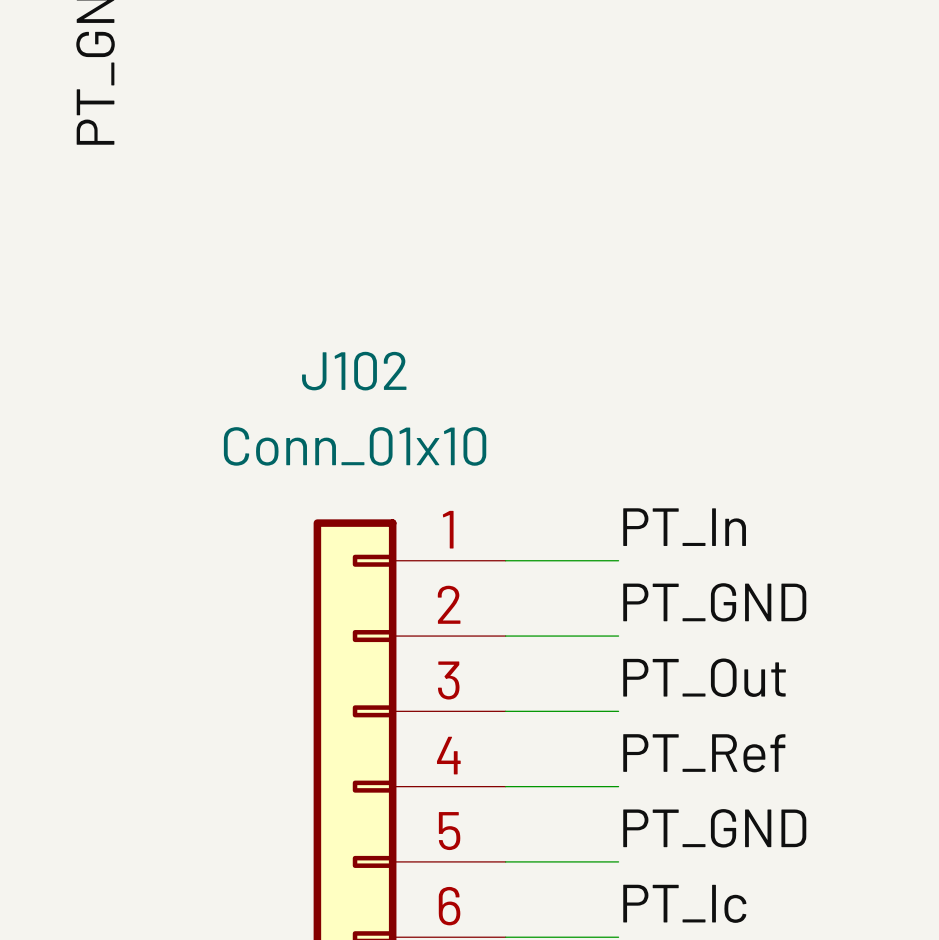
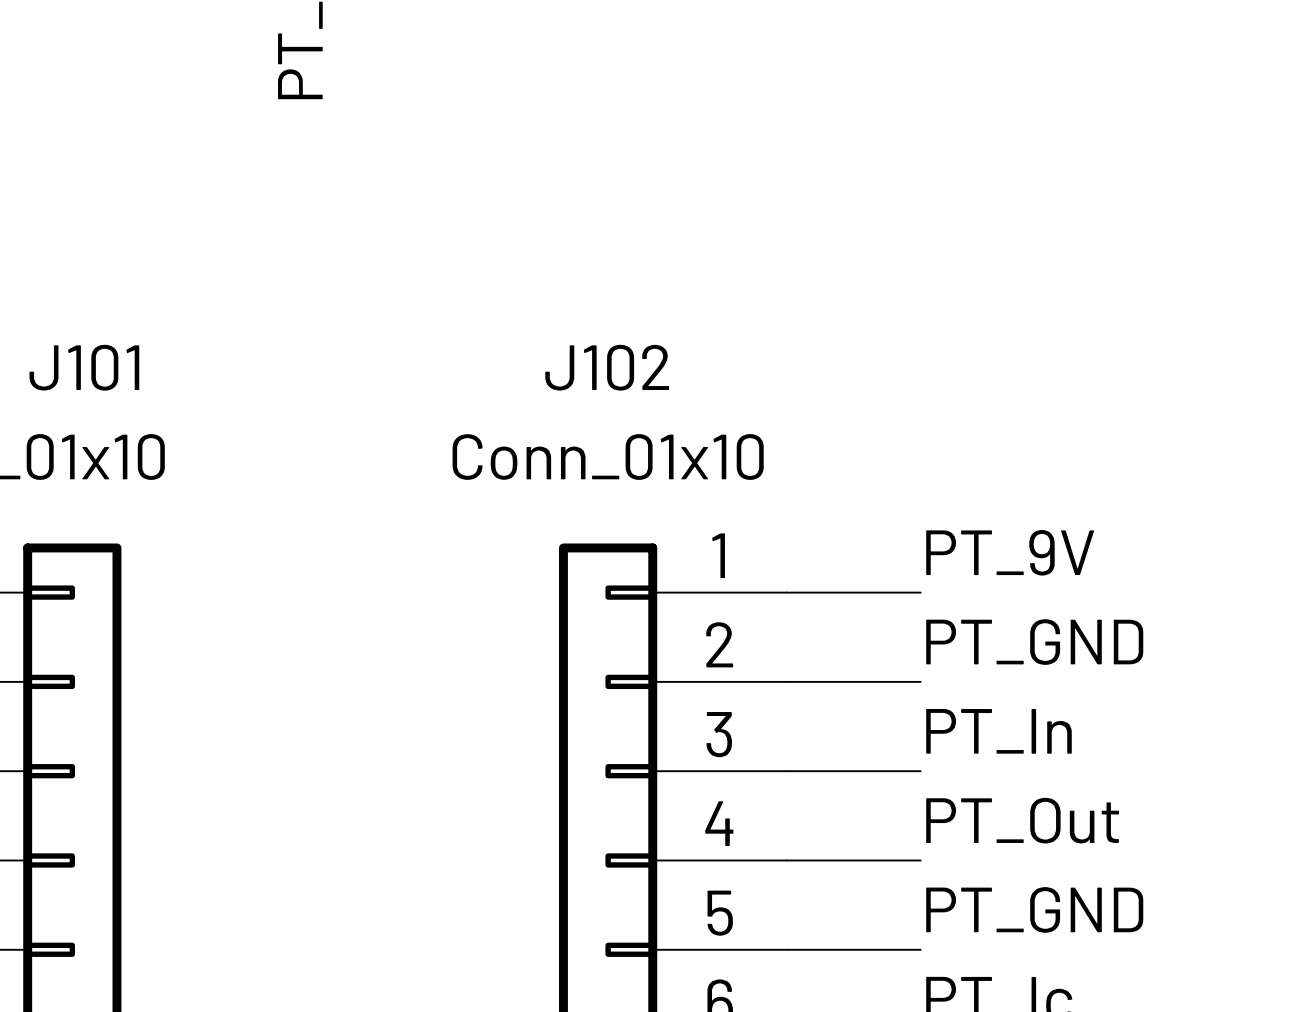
label: PT_In (684, 527) -> PT_9V (1010, 552)
label: PT_Out (704, 677) -> PT_In (998, 731)
label: PT_Ref (704, 753) -> PT_Out (1022, 820)

